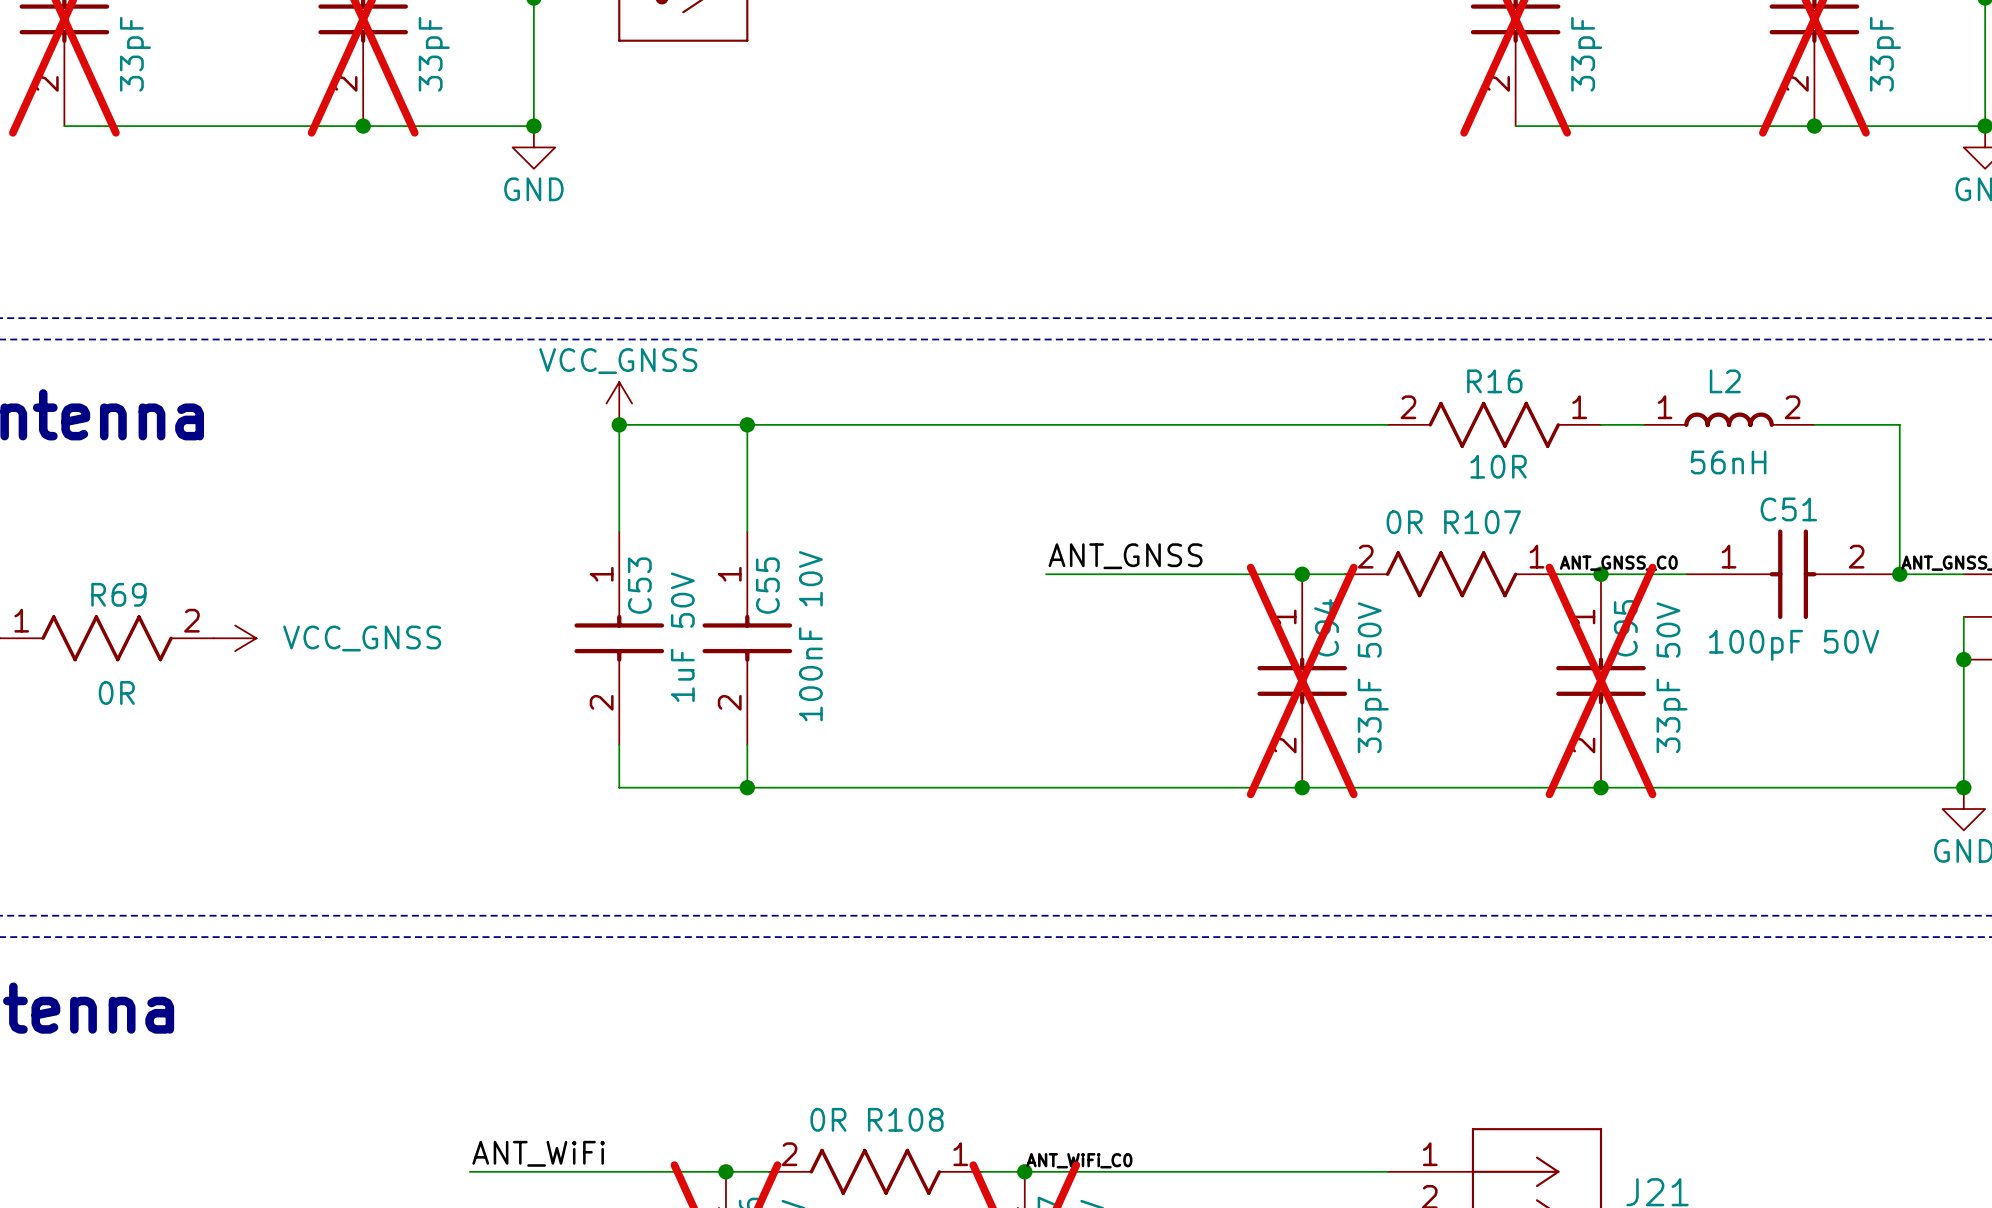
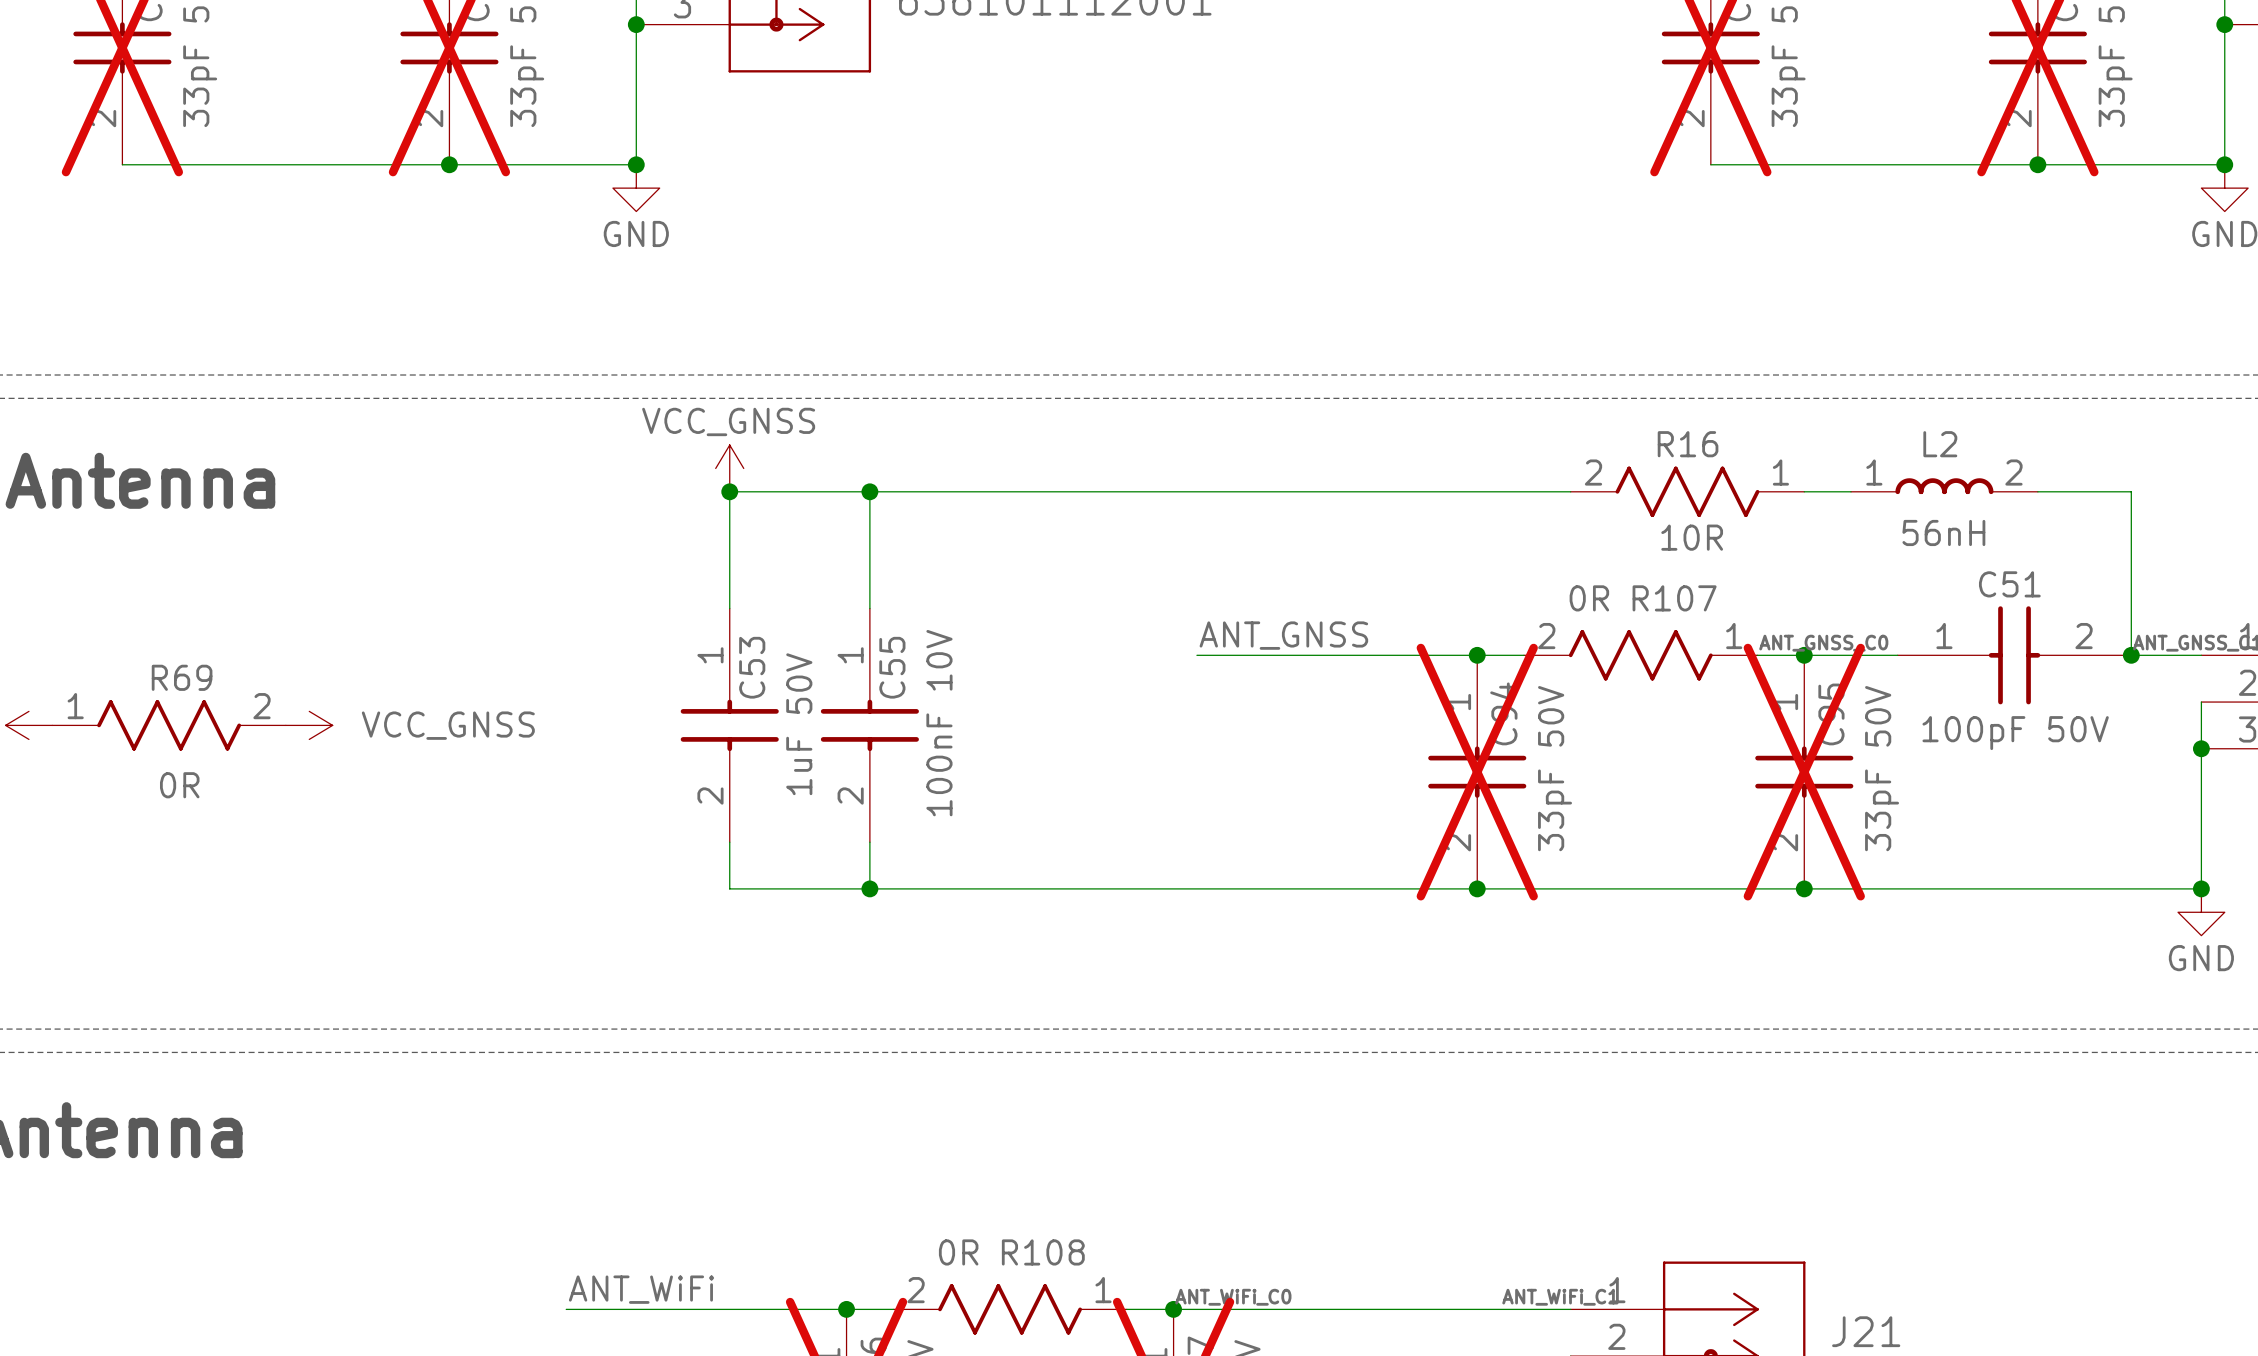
label: none -> ANT_WiFi_C1 (1560, 1297)

